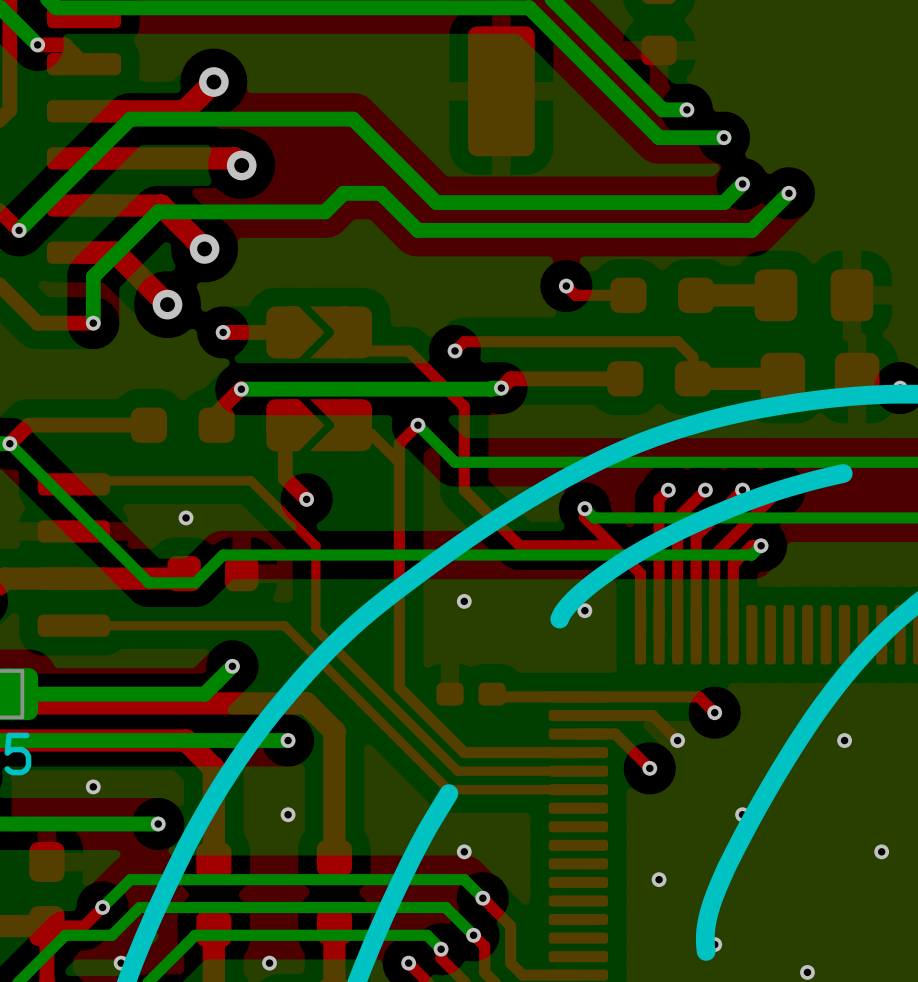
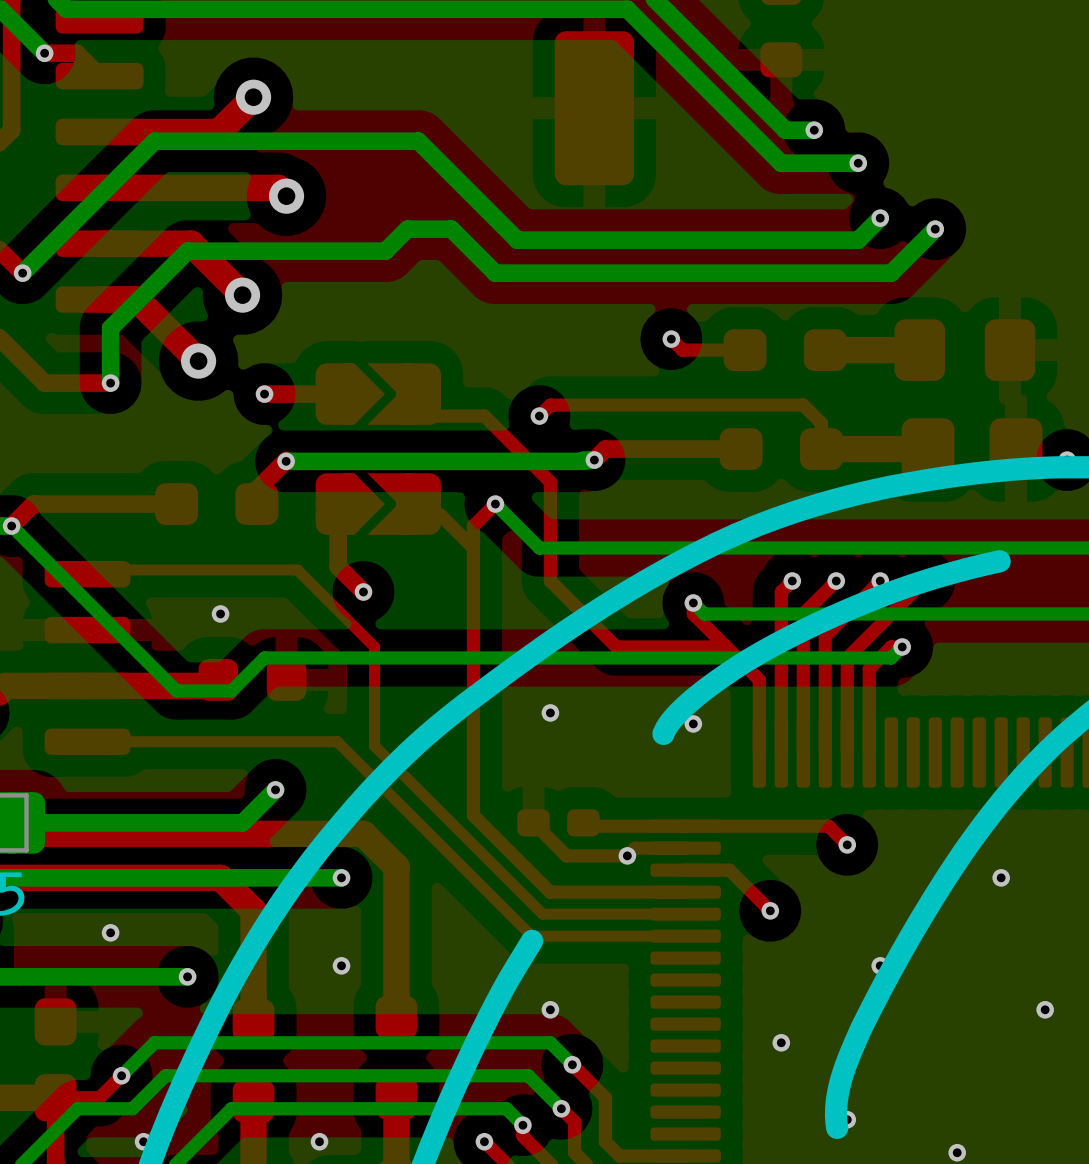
top track: (578, 715) (652, 715) (677, 740) -> (685, 848) (635, 848) (627, 855) (566, 855) (533, 822)
via position: (677, 740) -> (627, 855)

